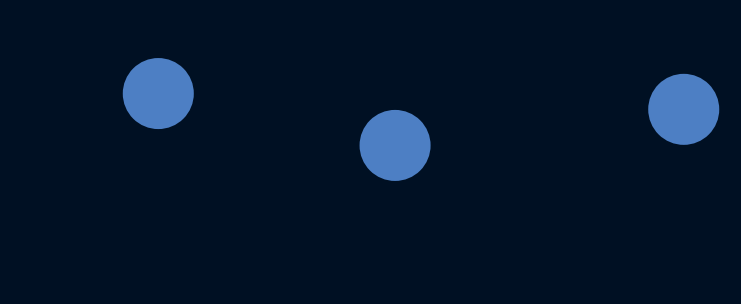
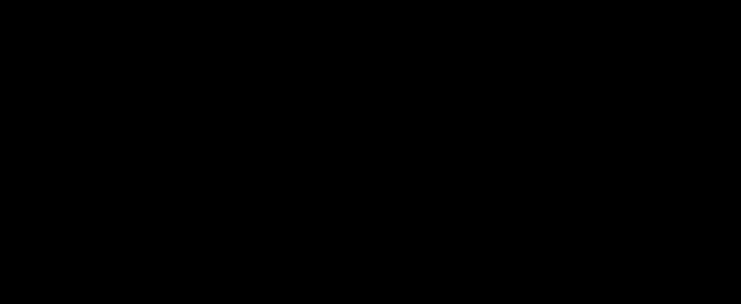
part: (158, 93) -> none
part: (683, 109) -> none
part: (395, 145) -> none

